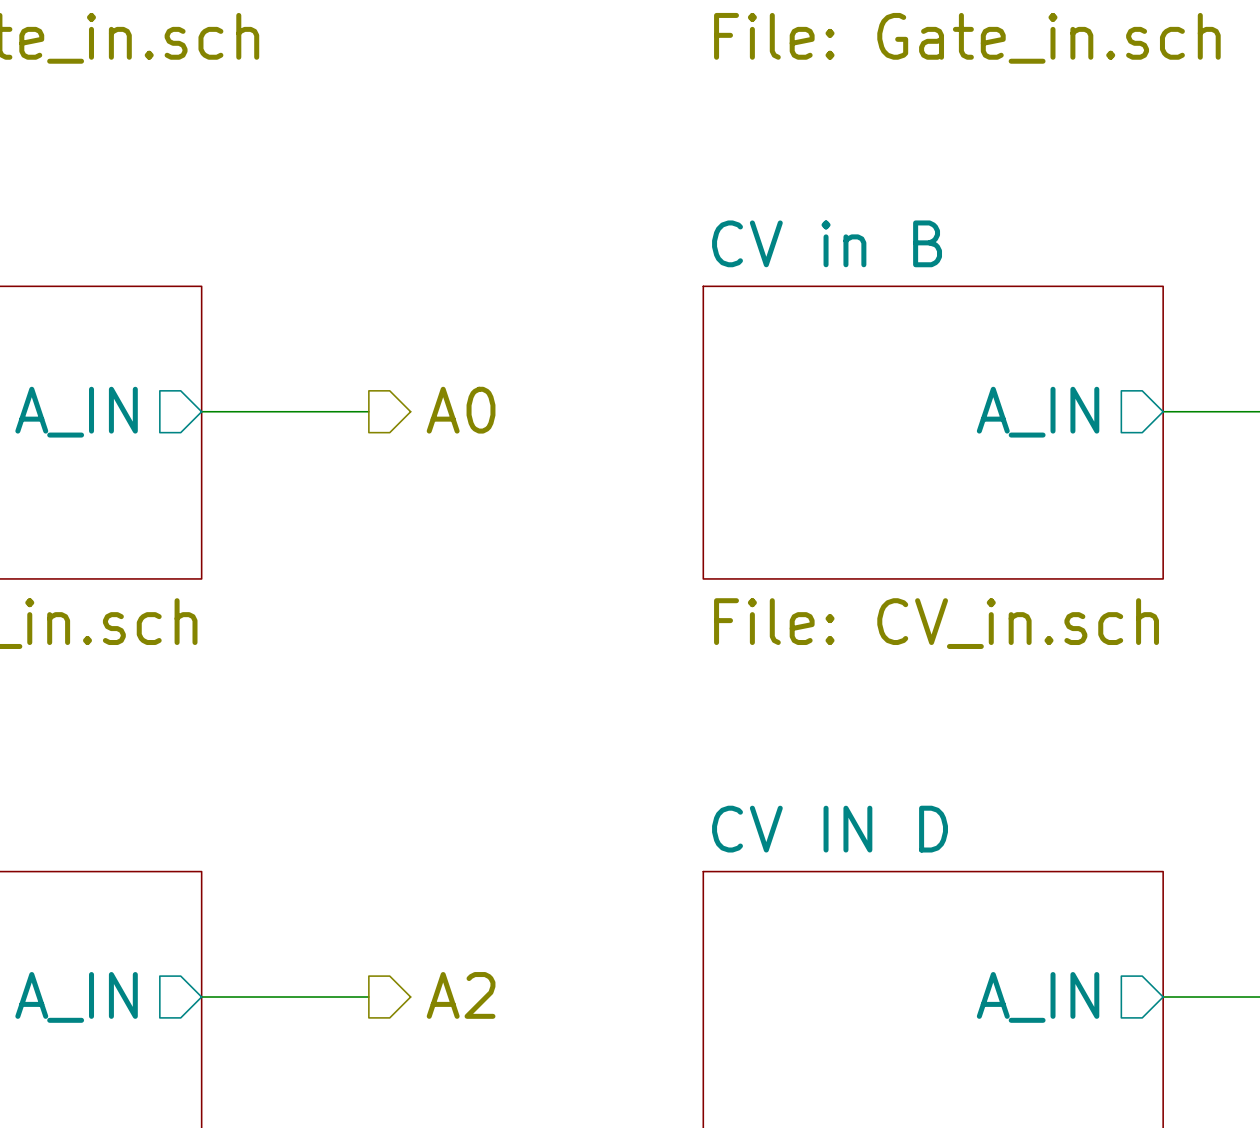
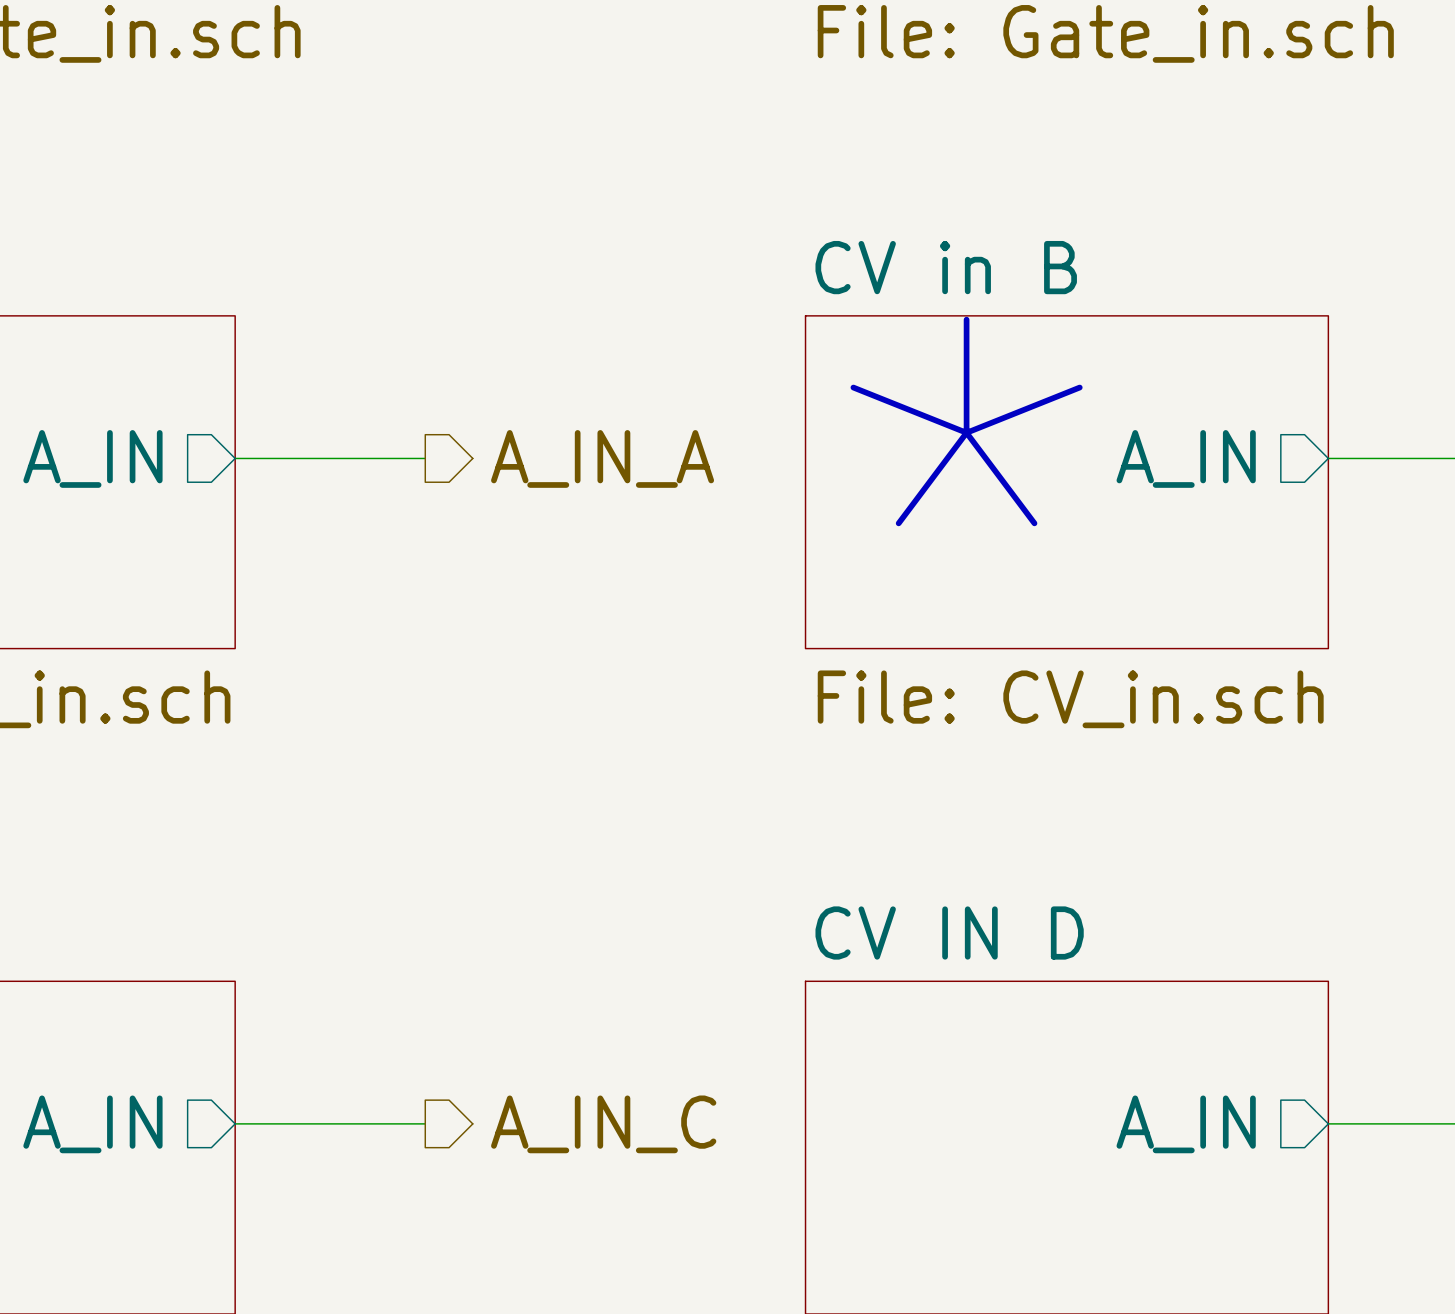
text: none -> * (966, 421)
hierarchical label: A0 (461, 410) -> A_IN_A (602, 458)
hierarchical label: A2 (461, 995) -> A_IN_C (603, 1124)

